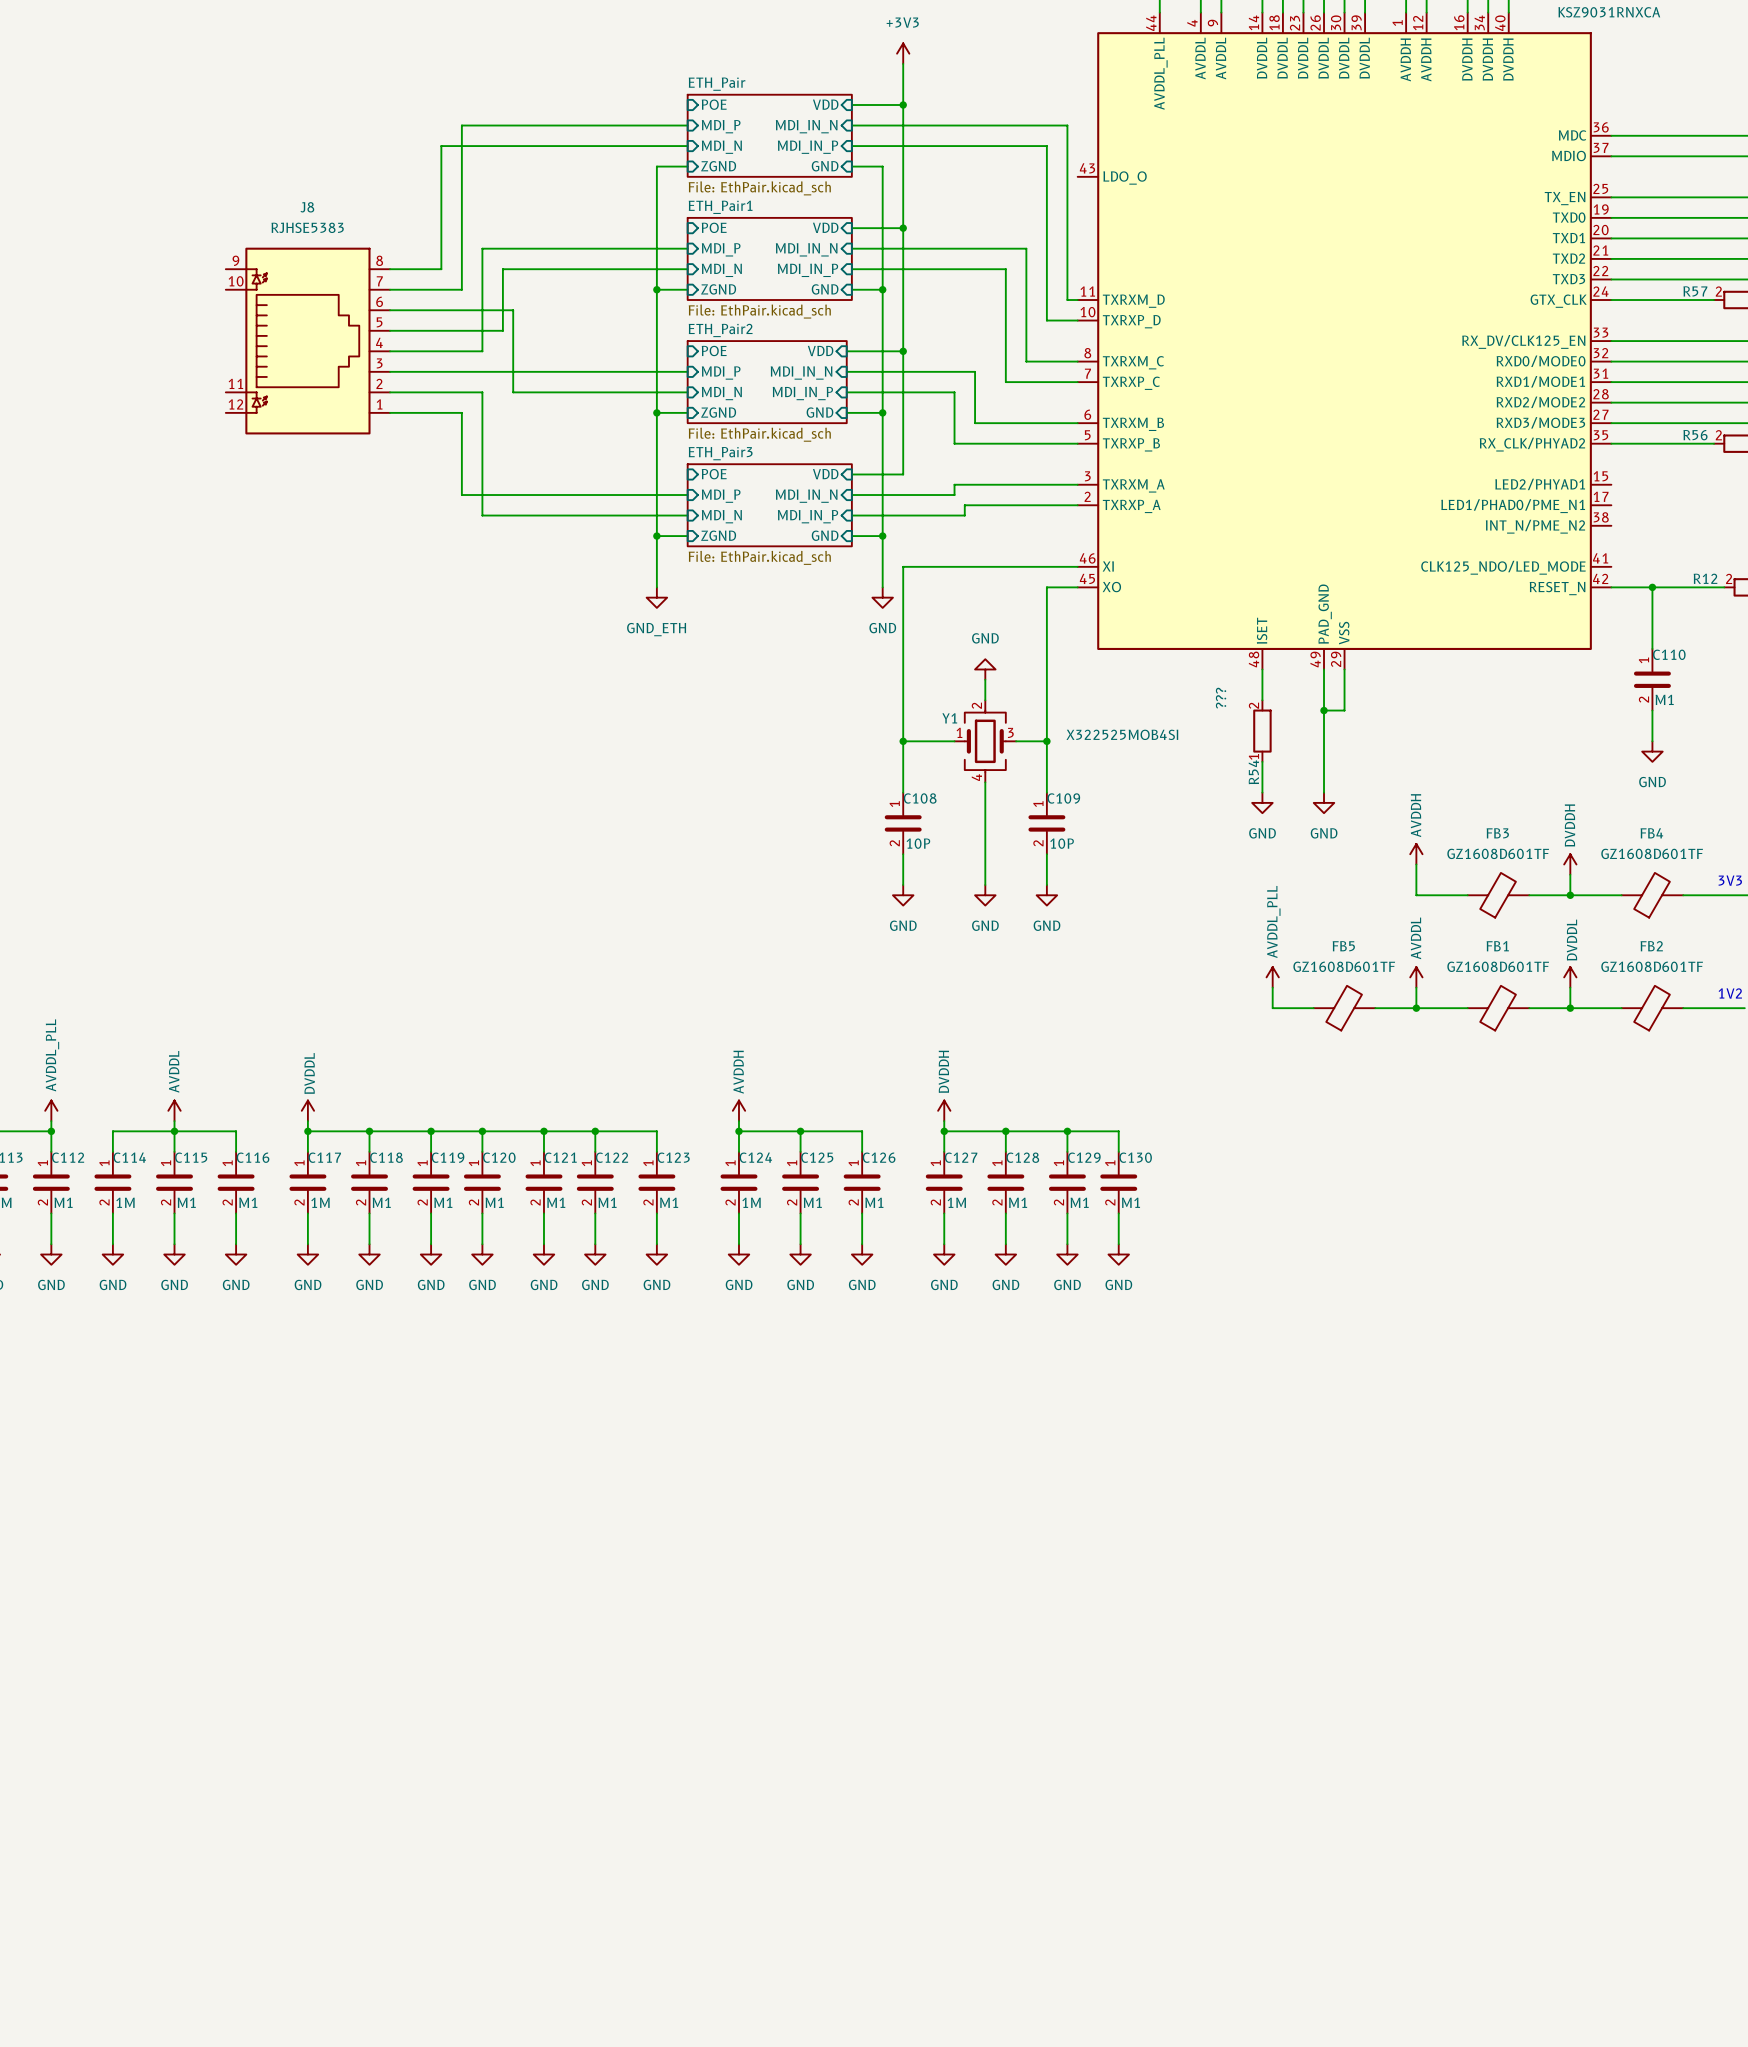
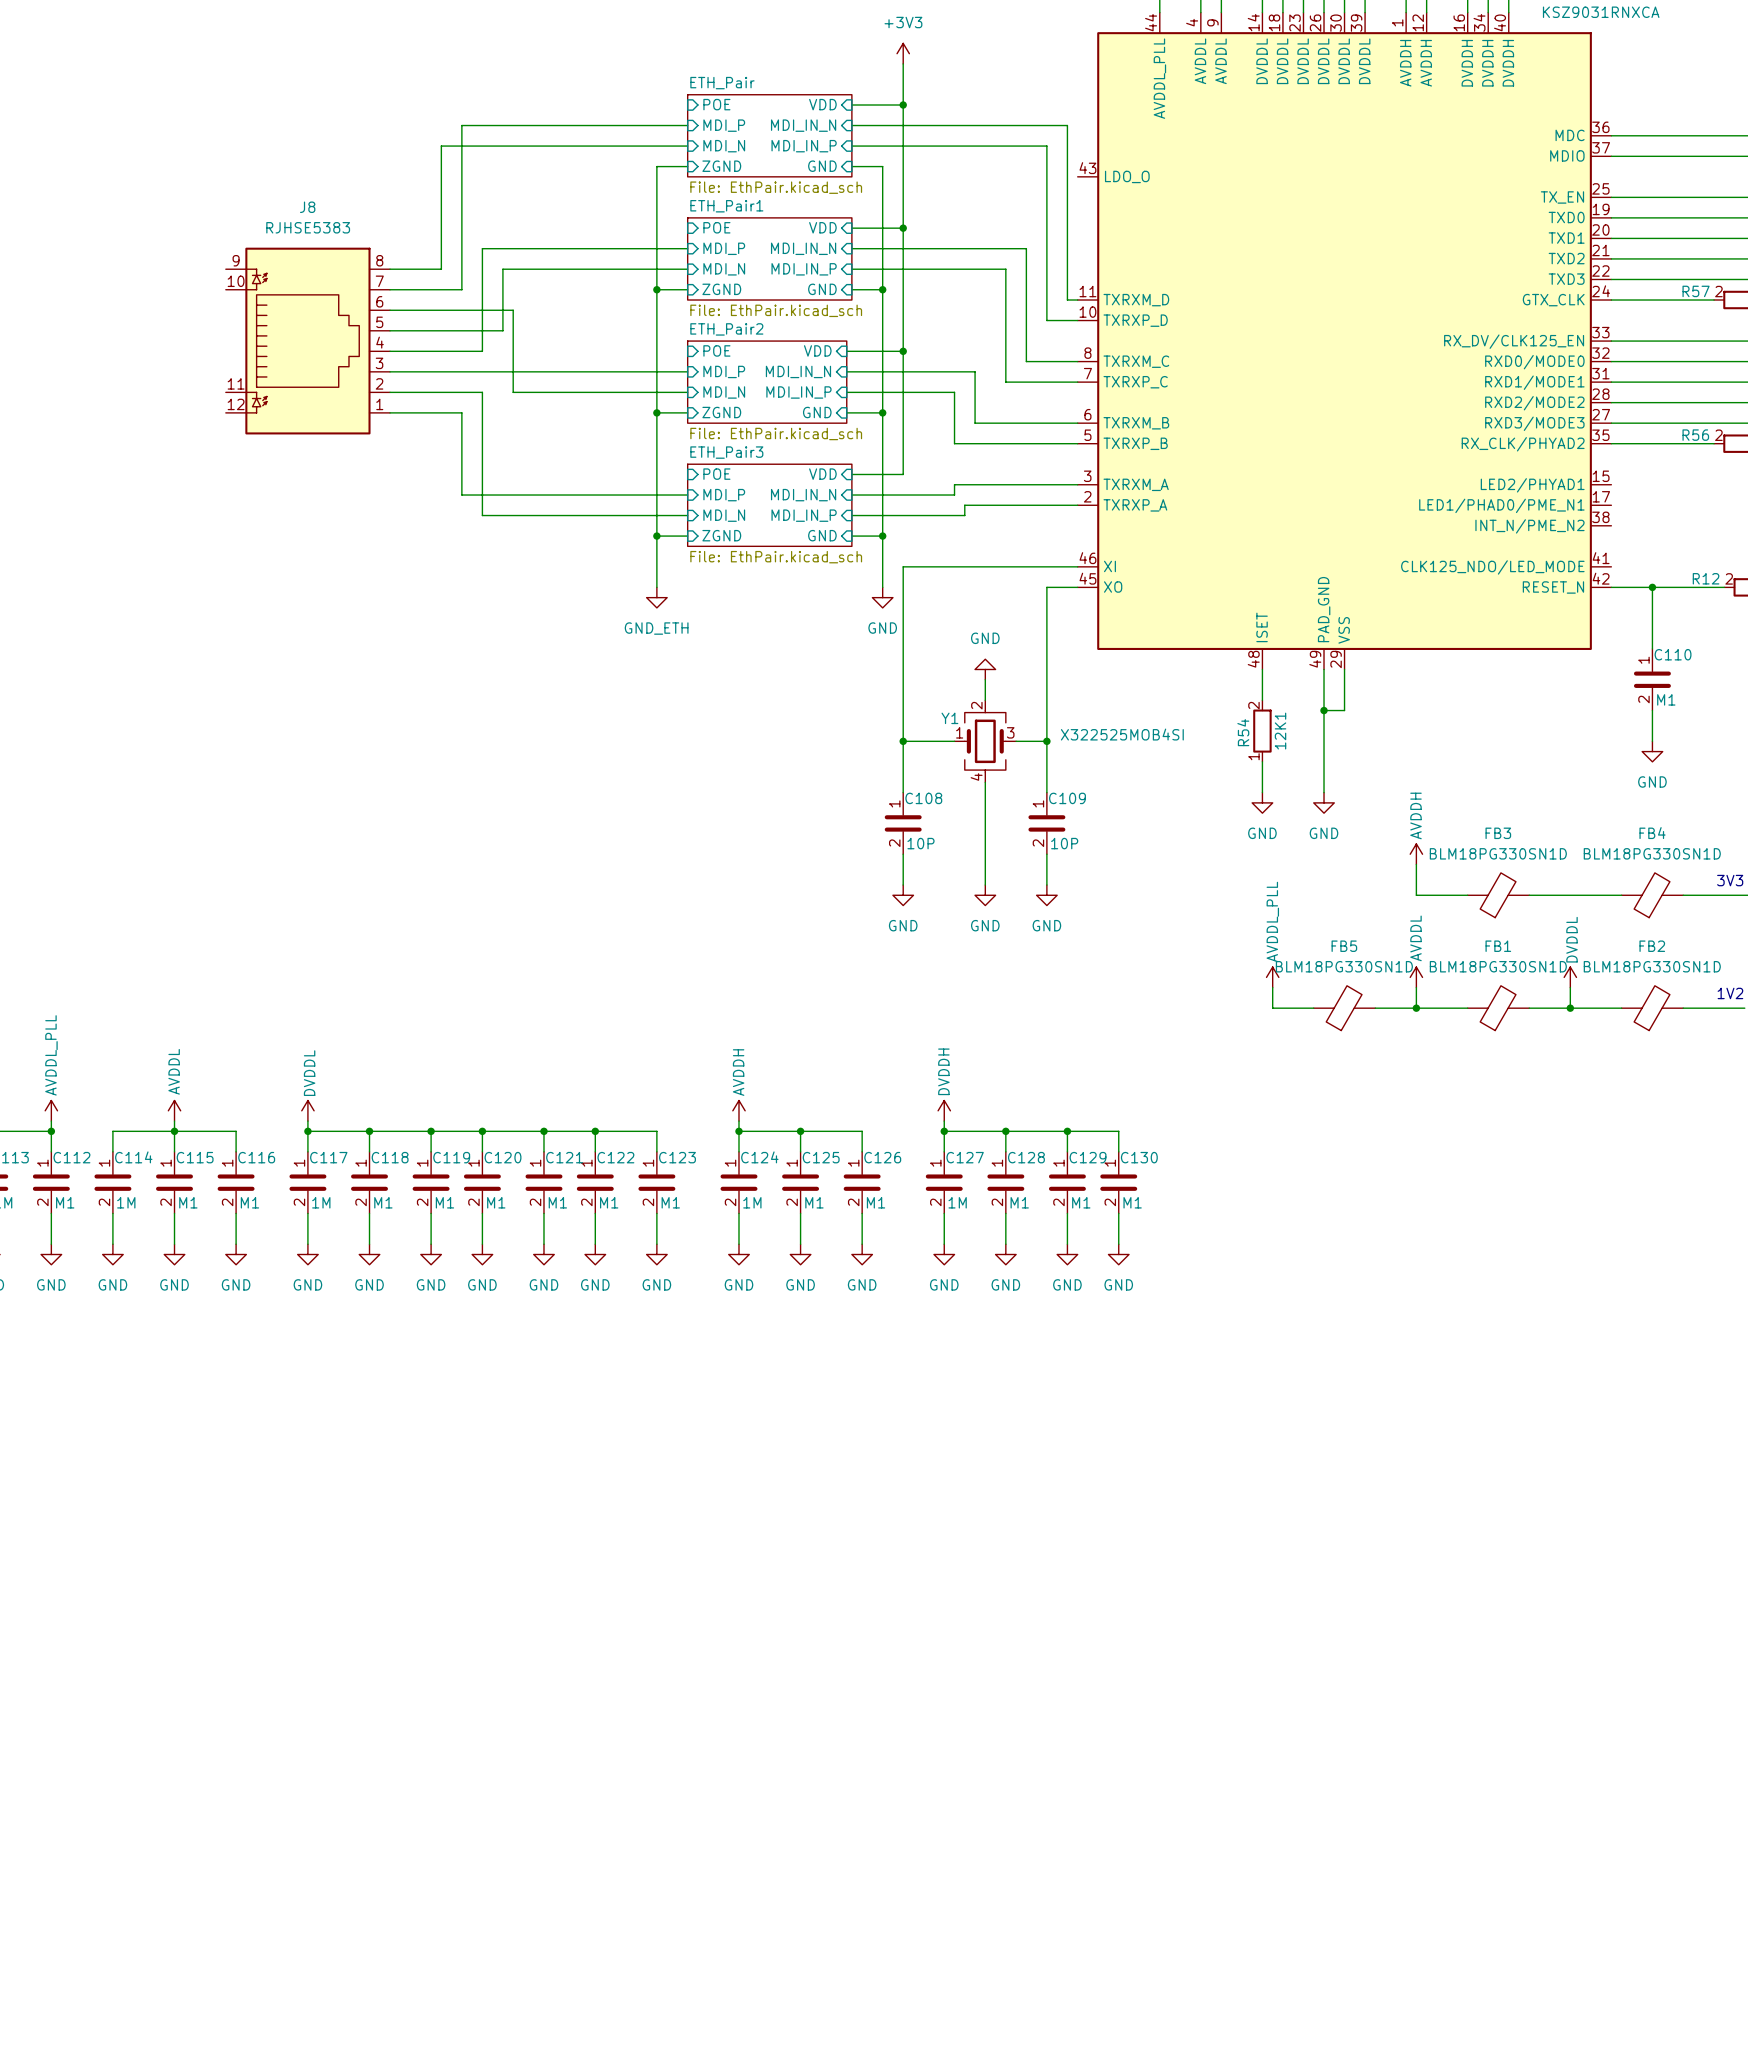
R54 value: ??? (1221, 698) -> 12K1 (1280, 731)
R54 name position: R54 (1253, 772) -> R54 (1243, 732)
FB3 value: GZ1608D601TF (1498, 853) -> BLM18PG330SN1D (1498, 853)
FB4 value: GZ1608D601TF (1652, 853) -> BLM18PG330SN1D (1652, 853)
power symbol: DVDDH (1570, 864) -> none
wire: (1570, 874) (1570, 895) -> none
junction: (1570, 895) -> none
FB5 value: GZ1608D601TF (1344, 966) -> BLM18PG330SN1D (1344, 966)
FB1 value: GZ1608D601TF (1498, 966) -> BLM18PG330SN1D (1498, 966)
FB2 value: GZ1608D601TF (1652, 966) -> BLM18PG330SN1D (1652, 966)

